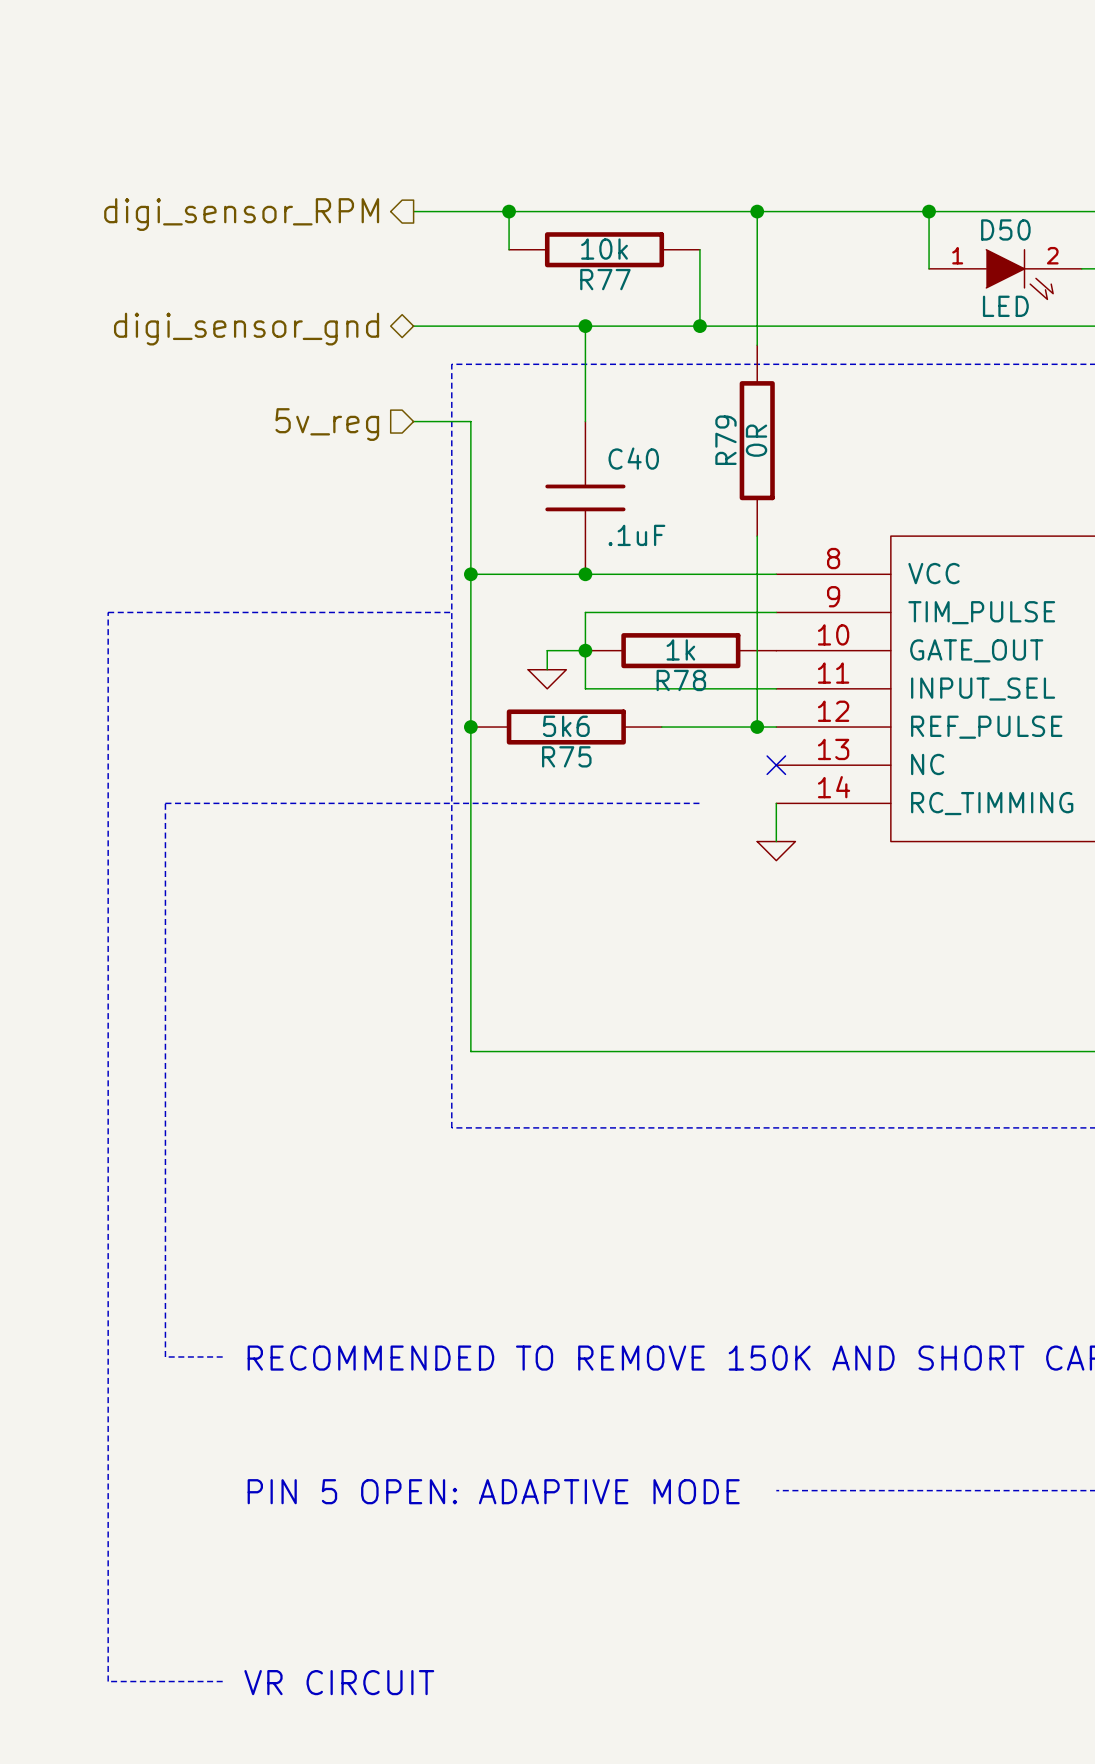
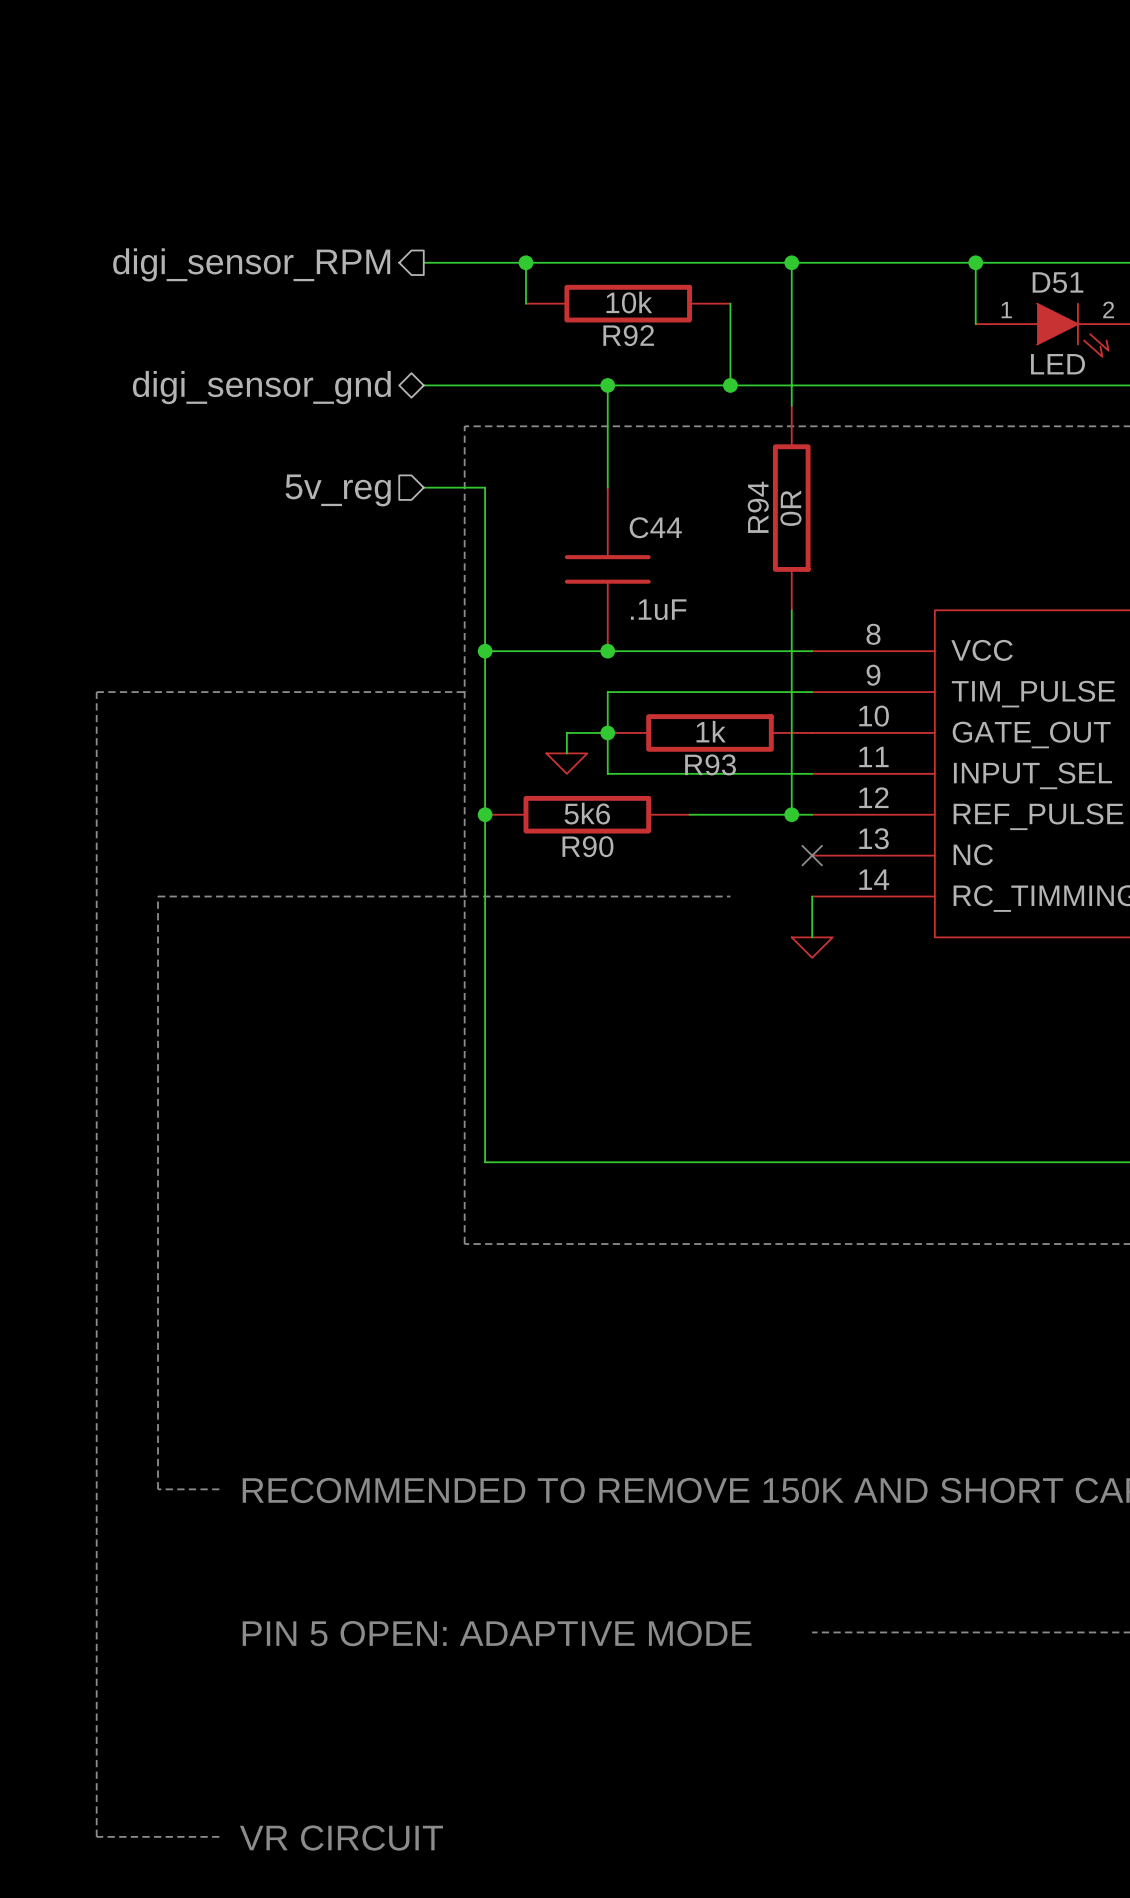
D50 name: D50 (1005, 229) -> D51 (1057, 282)
R77 name: R77 (605, 279) -> R92 (628, 335)
R79 name: R79 (725, 440) -> R94 (758, 507)
C40 name: C40 (633, 458) -> C44 (655, 527)
R78 name: R78 (681, 680) -> R93 (710, 764)
R75 name: R75 (566, 756) -> R90 (587, 846)

